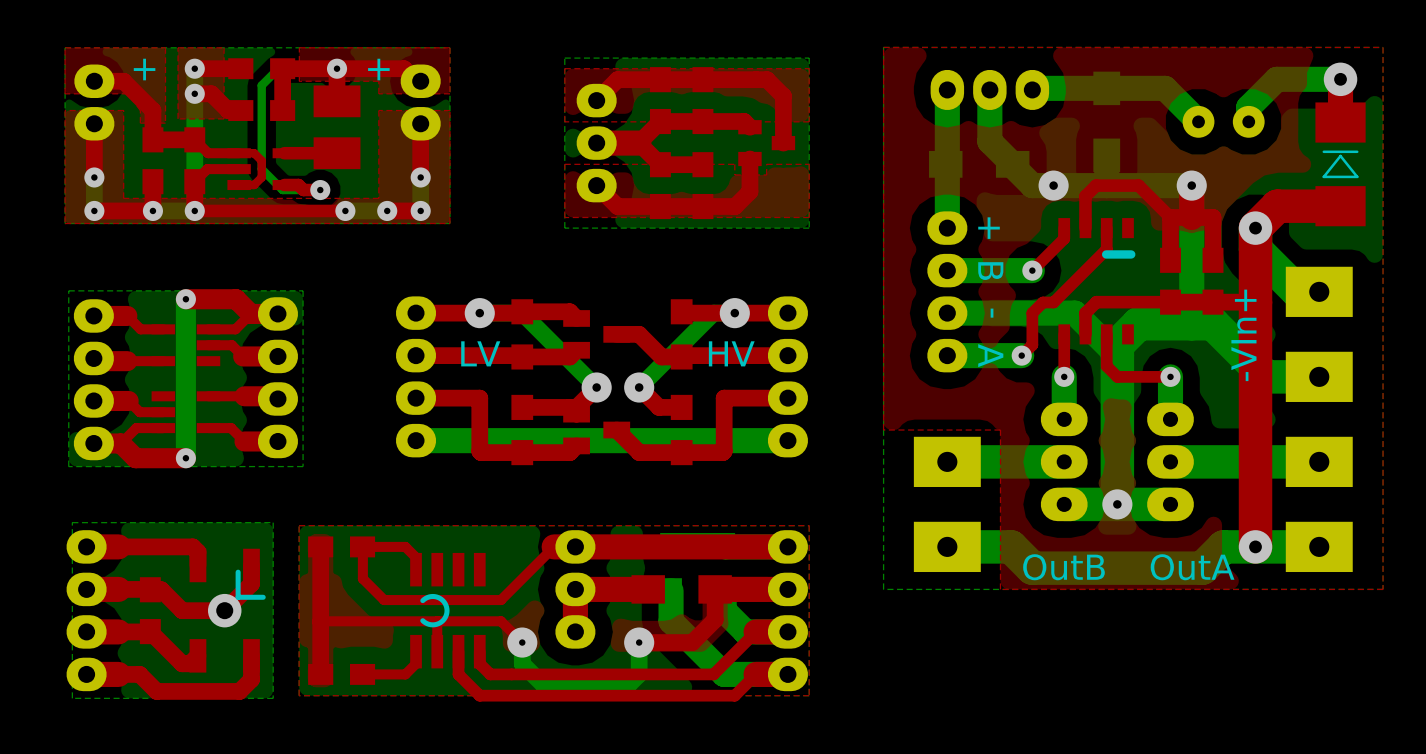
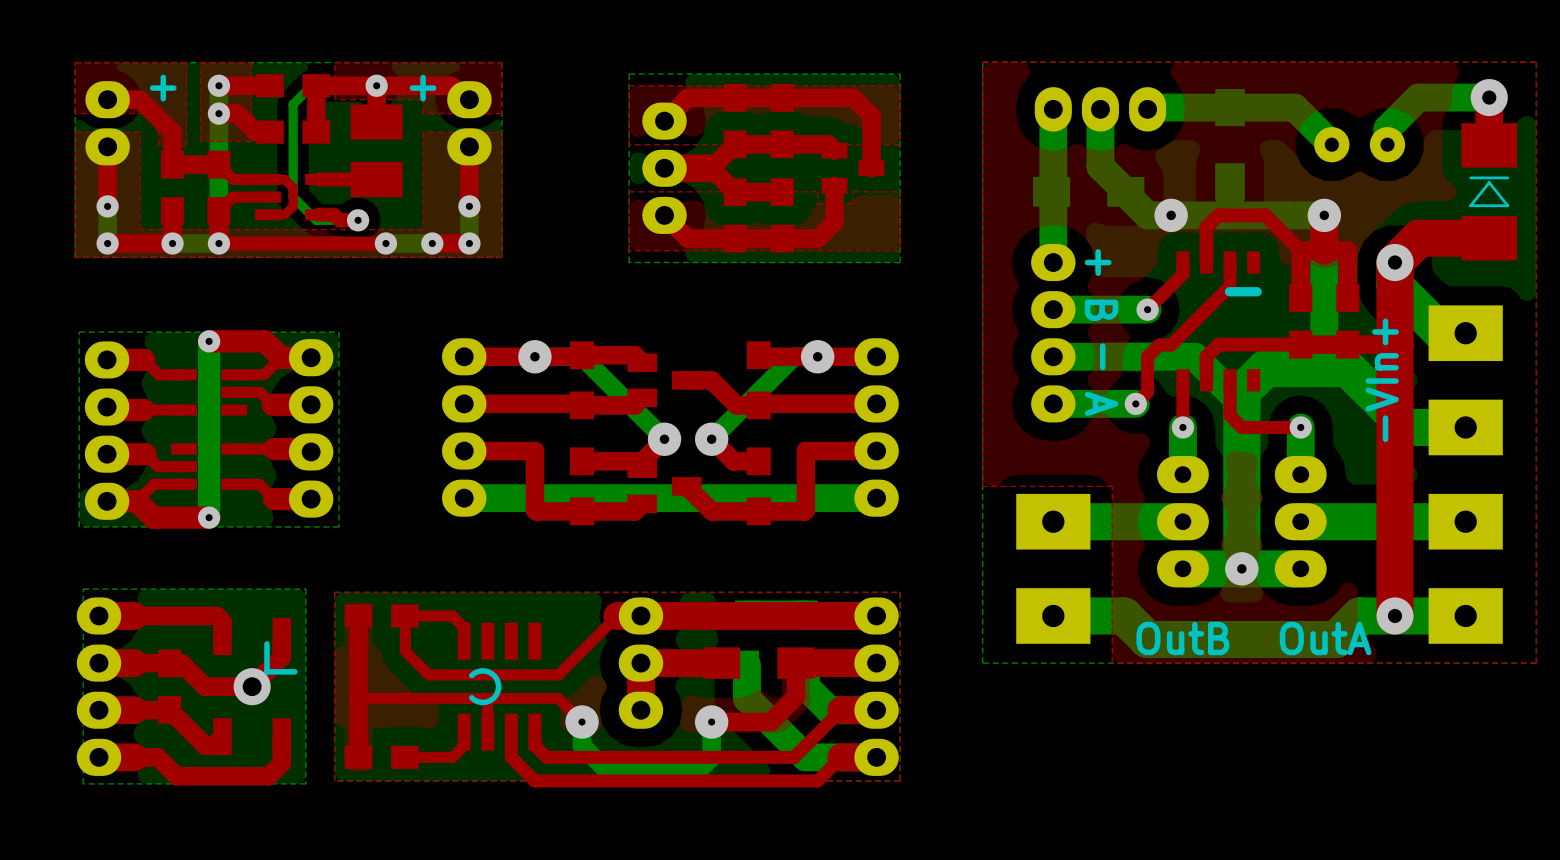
text: LV (480, 353) -> none
text: HV (731, 353) -> none

